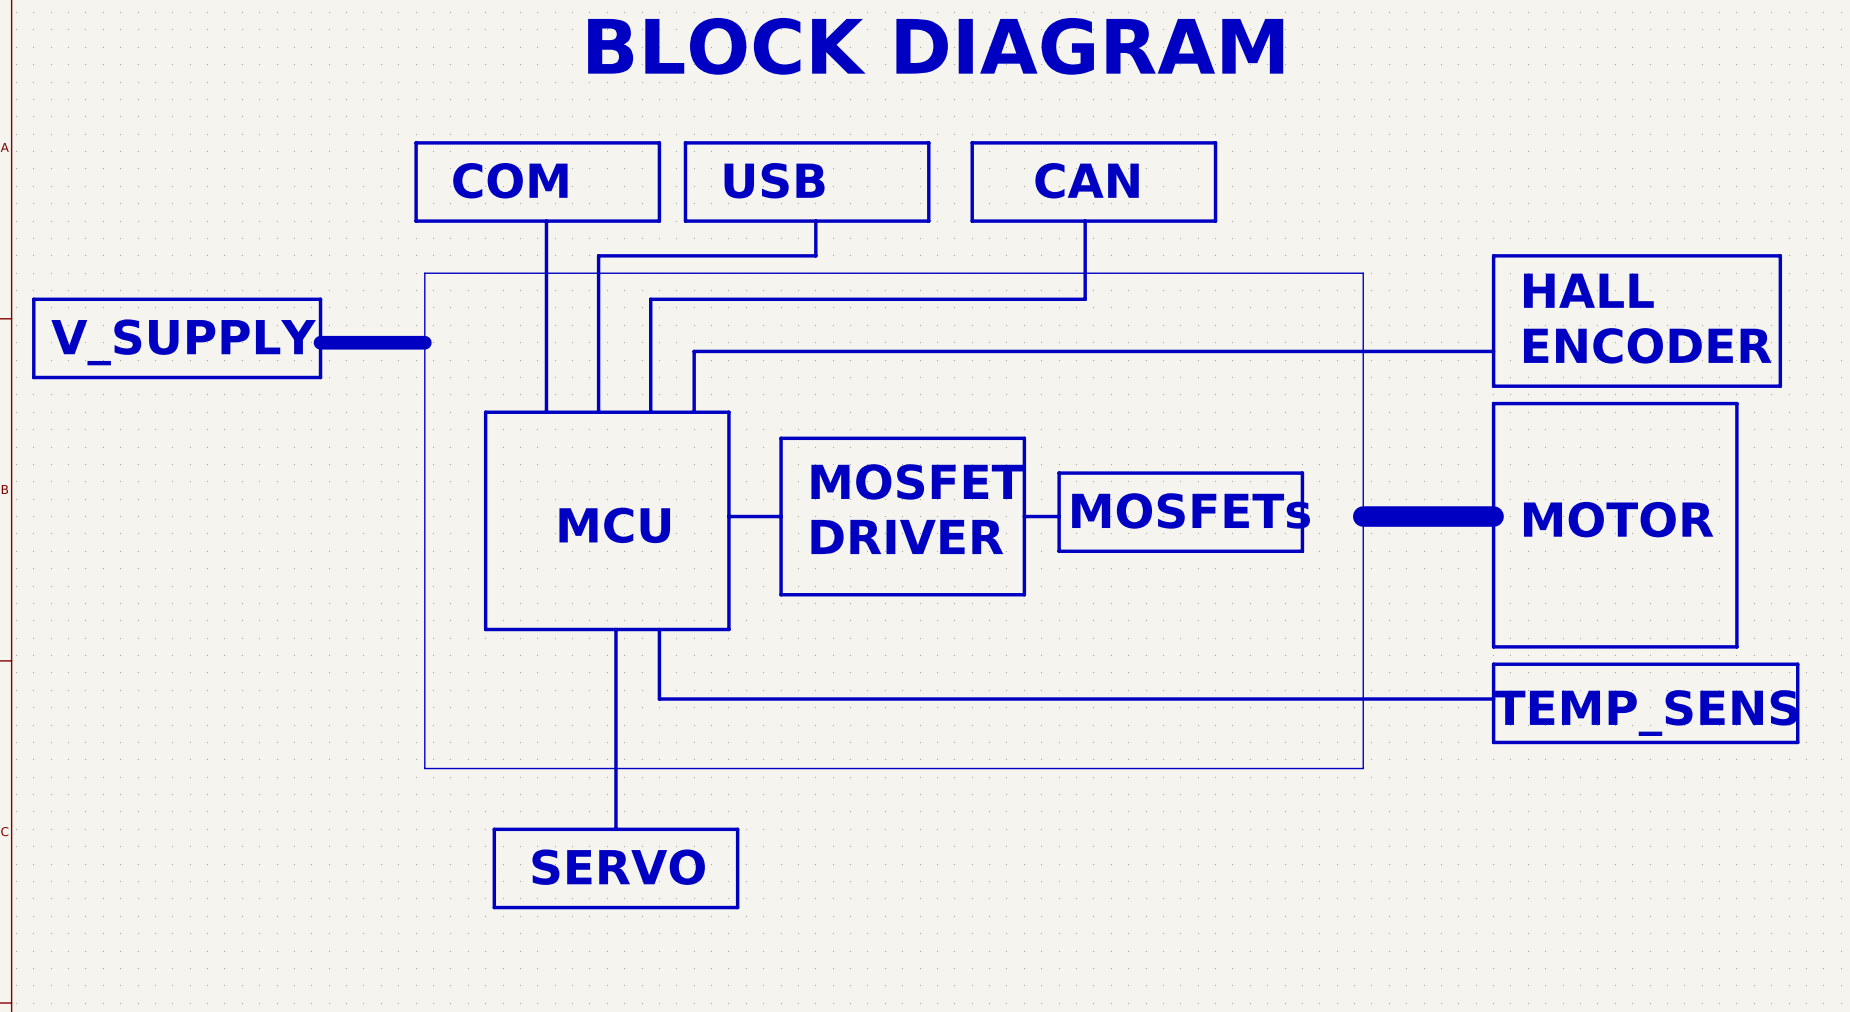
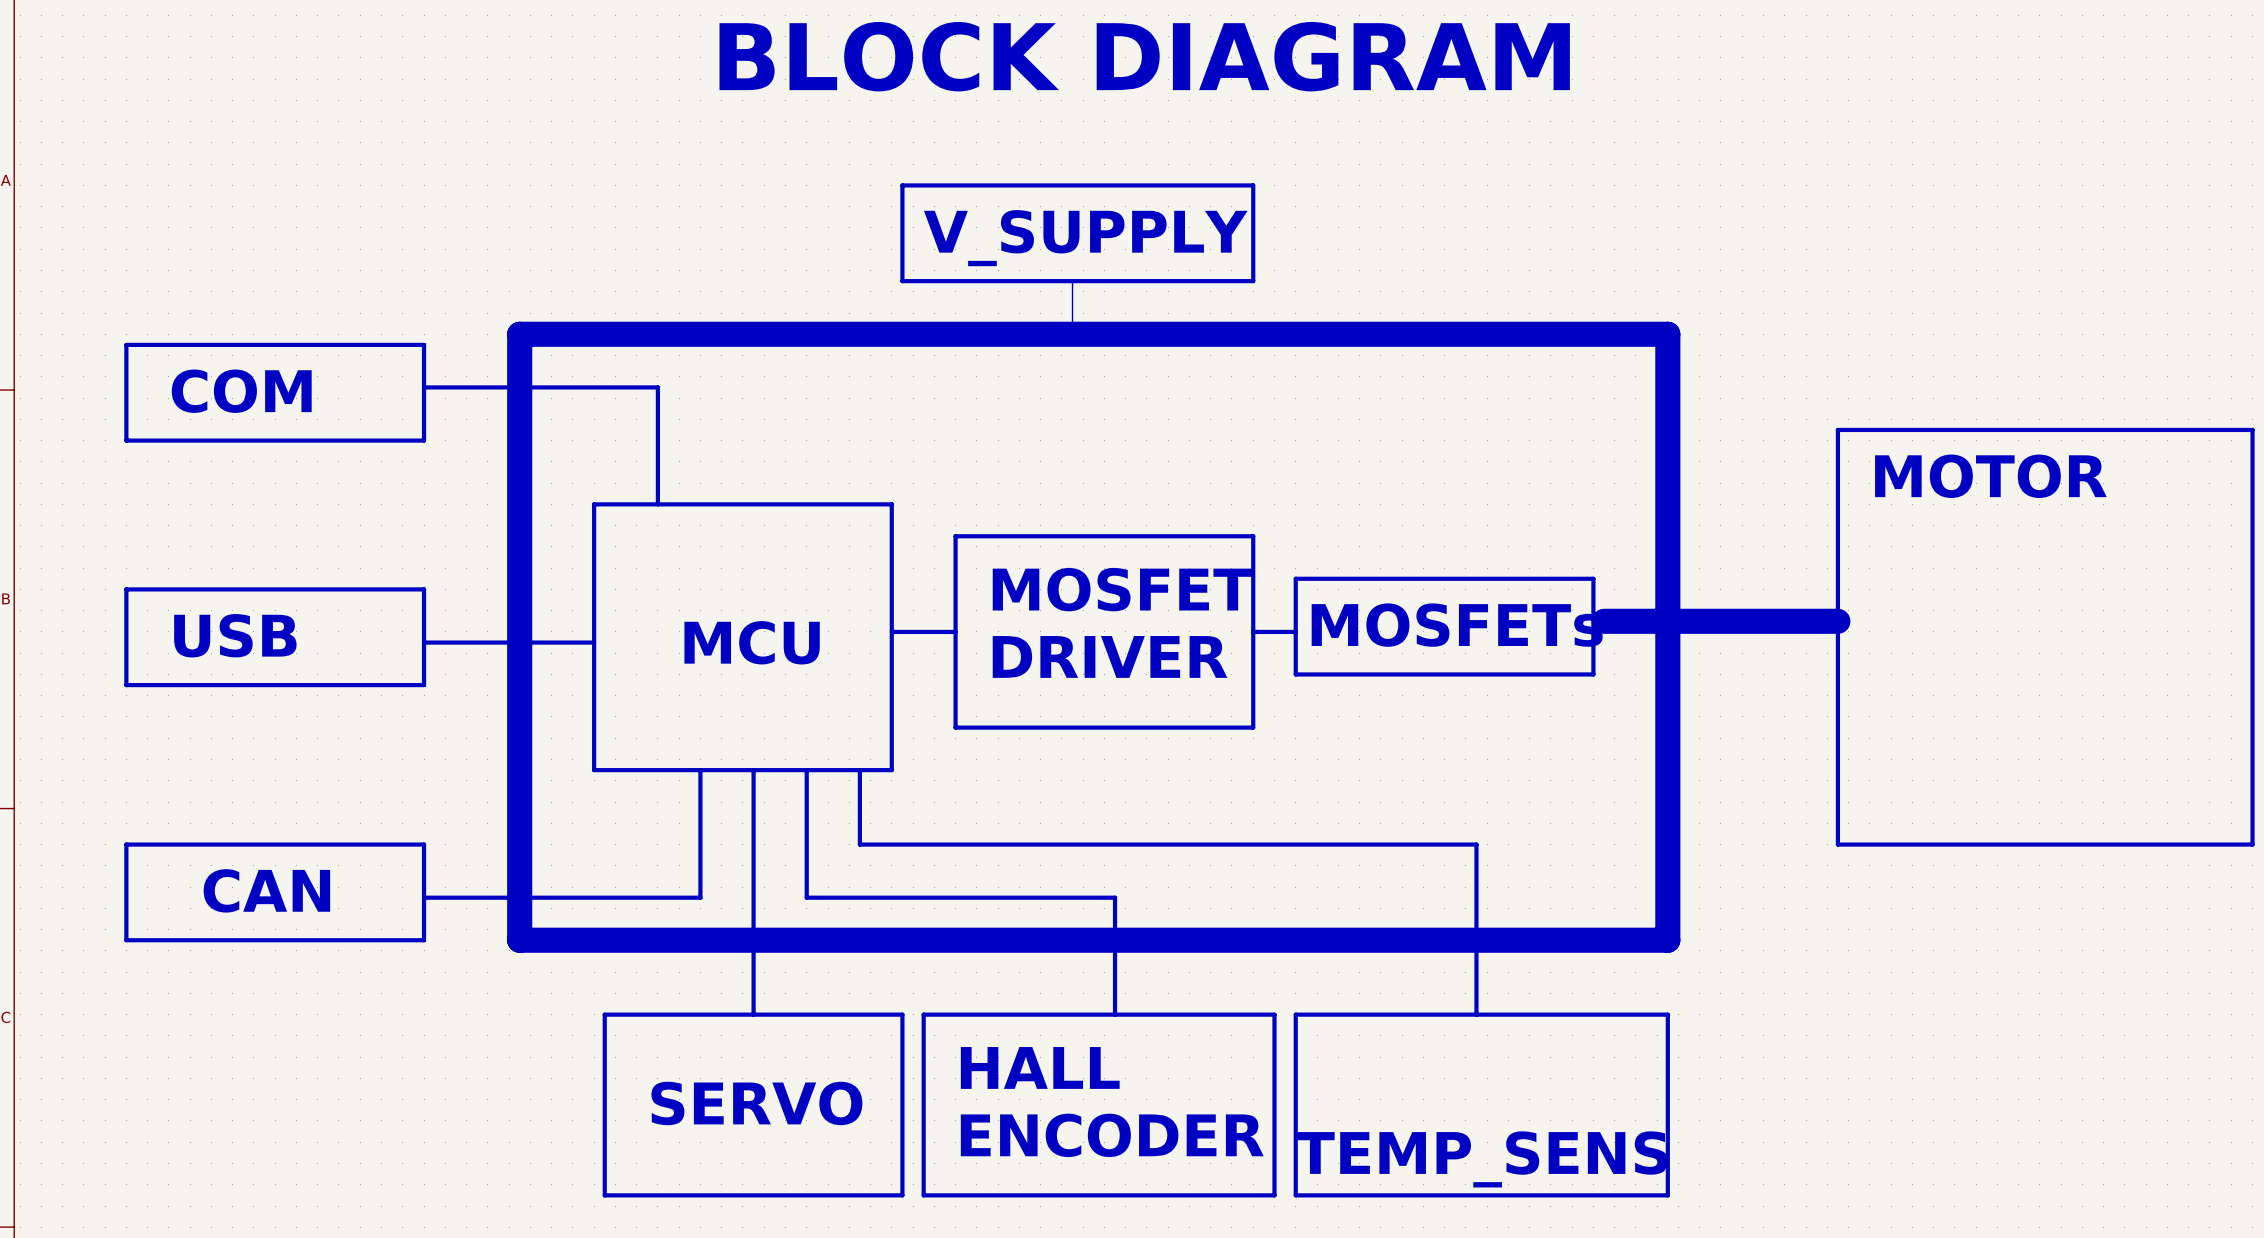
line: (416, 142) (659, 142) (659, 221) (416, 221) (416, 142) -> none
line: (685, 142) (928, 142) (928, 221) (685, 221) (685, 142) -> none
line: (972, 142) (1215, 142) (1215, 221) (972, 221) (972, 142) -> none
line: none -> (902, 185) (1253, 185) (1253, 281) (902, 281) (902, 185)
text: COM (510, 180) -> none
text: USB (774, 180) -> none
text: CAN (1087, 180) -> none
text: none -> V_SUPPLY (1085, 238)
line: (546, 221) (546, 412) -> none
line: (815, 221) (815, 255) (598, 255) (598, 412) -> none
line: (1085, 221) (1085, 299) (650, 299) (650, 412) -> none
bus: none -> (1072, 281) (1072, 334)
line: (1493, 255) (1780, 255) (1780, 386) (1493, 386) (1493, 255) -> none
line width: thin (424, 273) (1363, 273) (1363, 768) (424, 768) (424, 273) -> thick (519, 334) (1667, 334) (1667, 940) (519, 940) (519, 334)
line: none -> (126, 344) (126, 440) (424, 440) (424, 344) (126, 344)
text: HALL (1588, 290) -> none
line: (33, 299) (320, 299) (320, 377) (33, 377) (33, 299) -> none
line: none -> (424, 387) (657, 387) (657, 504)
text: none -> COM (241, 391)
text: V_SUPPLY (183, 342) -> none
line: (320, 342) (424, 342) -> none
text: ENCODER (1647, 345) -> none
line: (1493, 351) (694, 351) (694, 412) -> none
line: none -> (1837, 429) (2252, 429) (2252, 844) (1837, 844) (1837, 429)
line: (1493, 403) (1736, 403) (1736, 646) (1493, 646) (1493, 403) -> none
line: none -> (126, 589) (126, 685) (424, 685) (424, 589) (126, 589)
line: none -> (1604, 621) (1837, 621)
line: (1363, 516) (1493, 516) -> none
text: none -> USB (235, 635)
text position: MOTOR (1618, 519) -> MOTOR (1990, 476)
line: none -> (424, 642) (594, 642)
line: none -> (700, 770) (700, 897)
line: none -> (859, 770) (859, 844) (1476, 844) (1476, 1014)
line: (1493, 664) (1493, 742) (1797, 742) (1797, 664) (1493, 664) -> none
line: none -> (126, 844) (424, 844) (424, 940) (126, 940) (126, 844)
line: (659, 699) (1493, 699) -> (806, 855) (806, 897) (1115, 897) (1115, 1014)
text: TEMP_SENS (1645, 713) -> none
text: none -> CAN (266, 890)
line: none -> (700, 897) (424, 897) (700, 897)
line: none -> (923, 1014) (1274, 1014) (1274, 1195) (923, 1195) (923, 1014)
line: none -> (1295, 1014) (1667, 1014) (1667, 1195) (1295, 1195) (1295, 1014)
text position: SERVO (618, 867) -> SERVO (756, 1103)
text: none -> HALL (1040, 1067)
line: (494, 907) (737, 907) -> (604, 1110) (604, 1195) (902, 1195) (902, 1110)
text: none -> ENCODER (1112, 1135)
text: none -> TEMP_SENS (1481, 1159)

